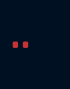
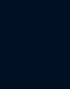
part: (20, 44) -> none

